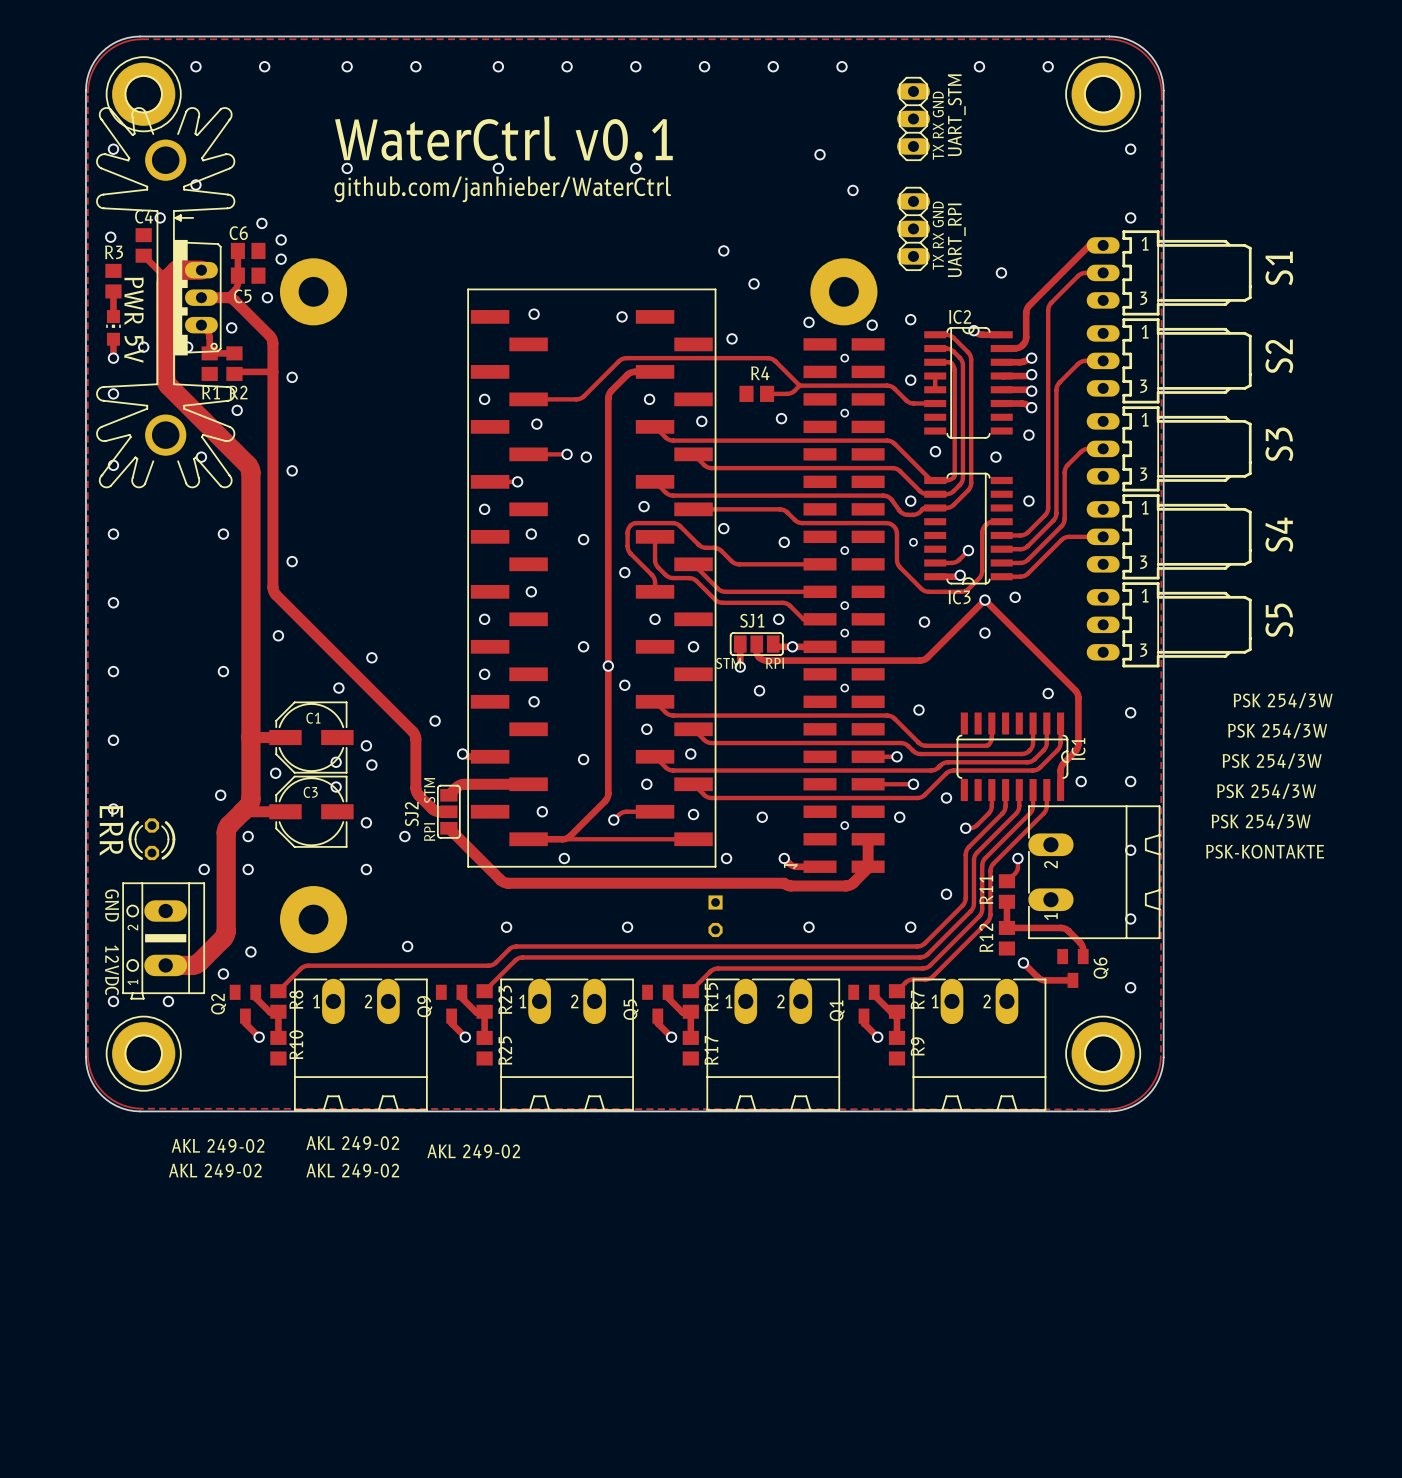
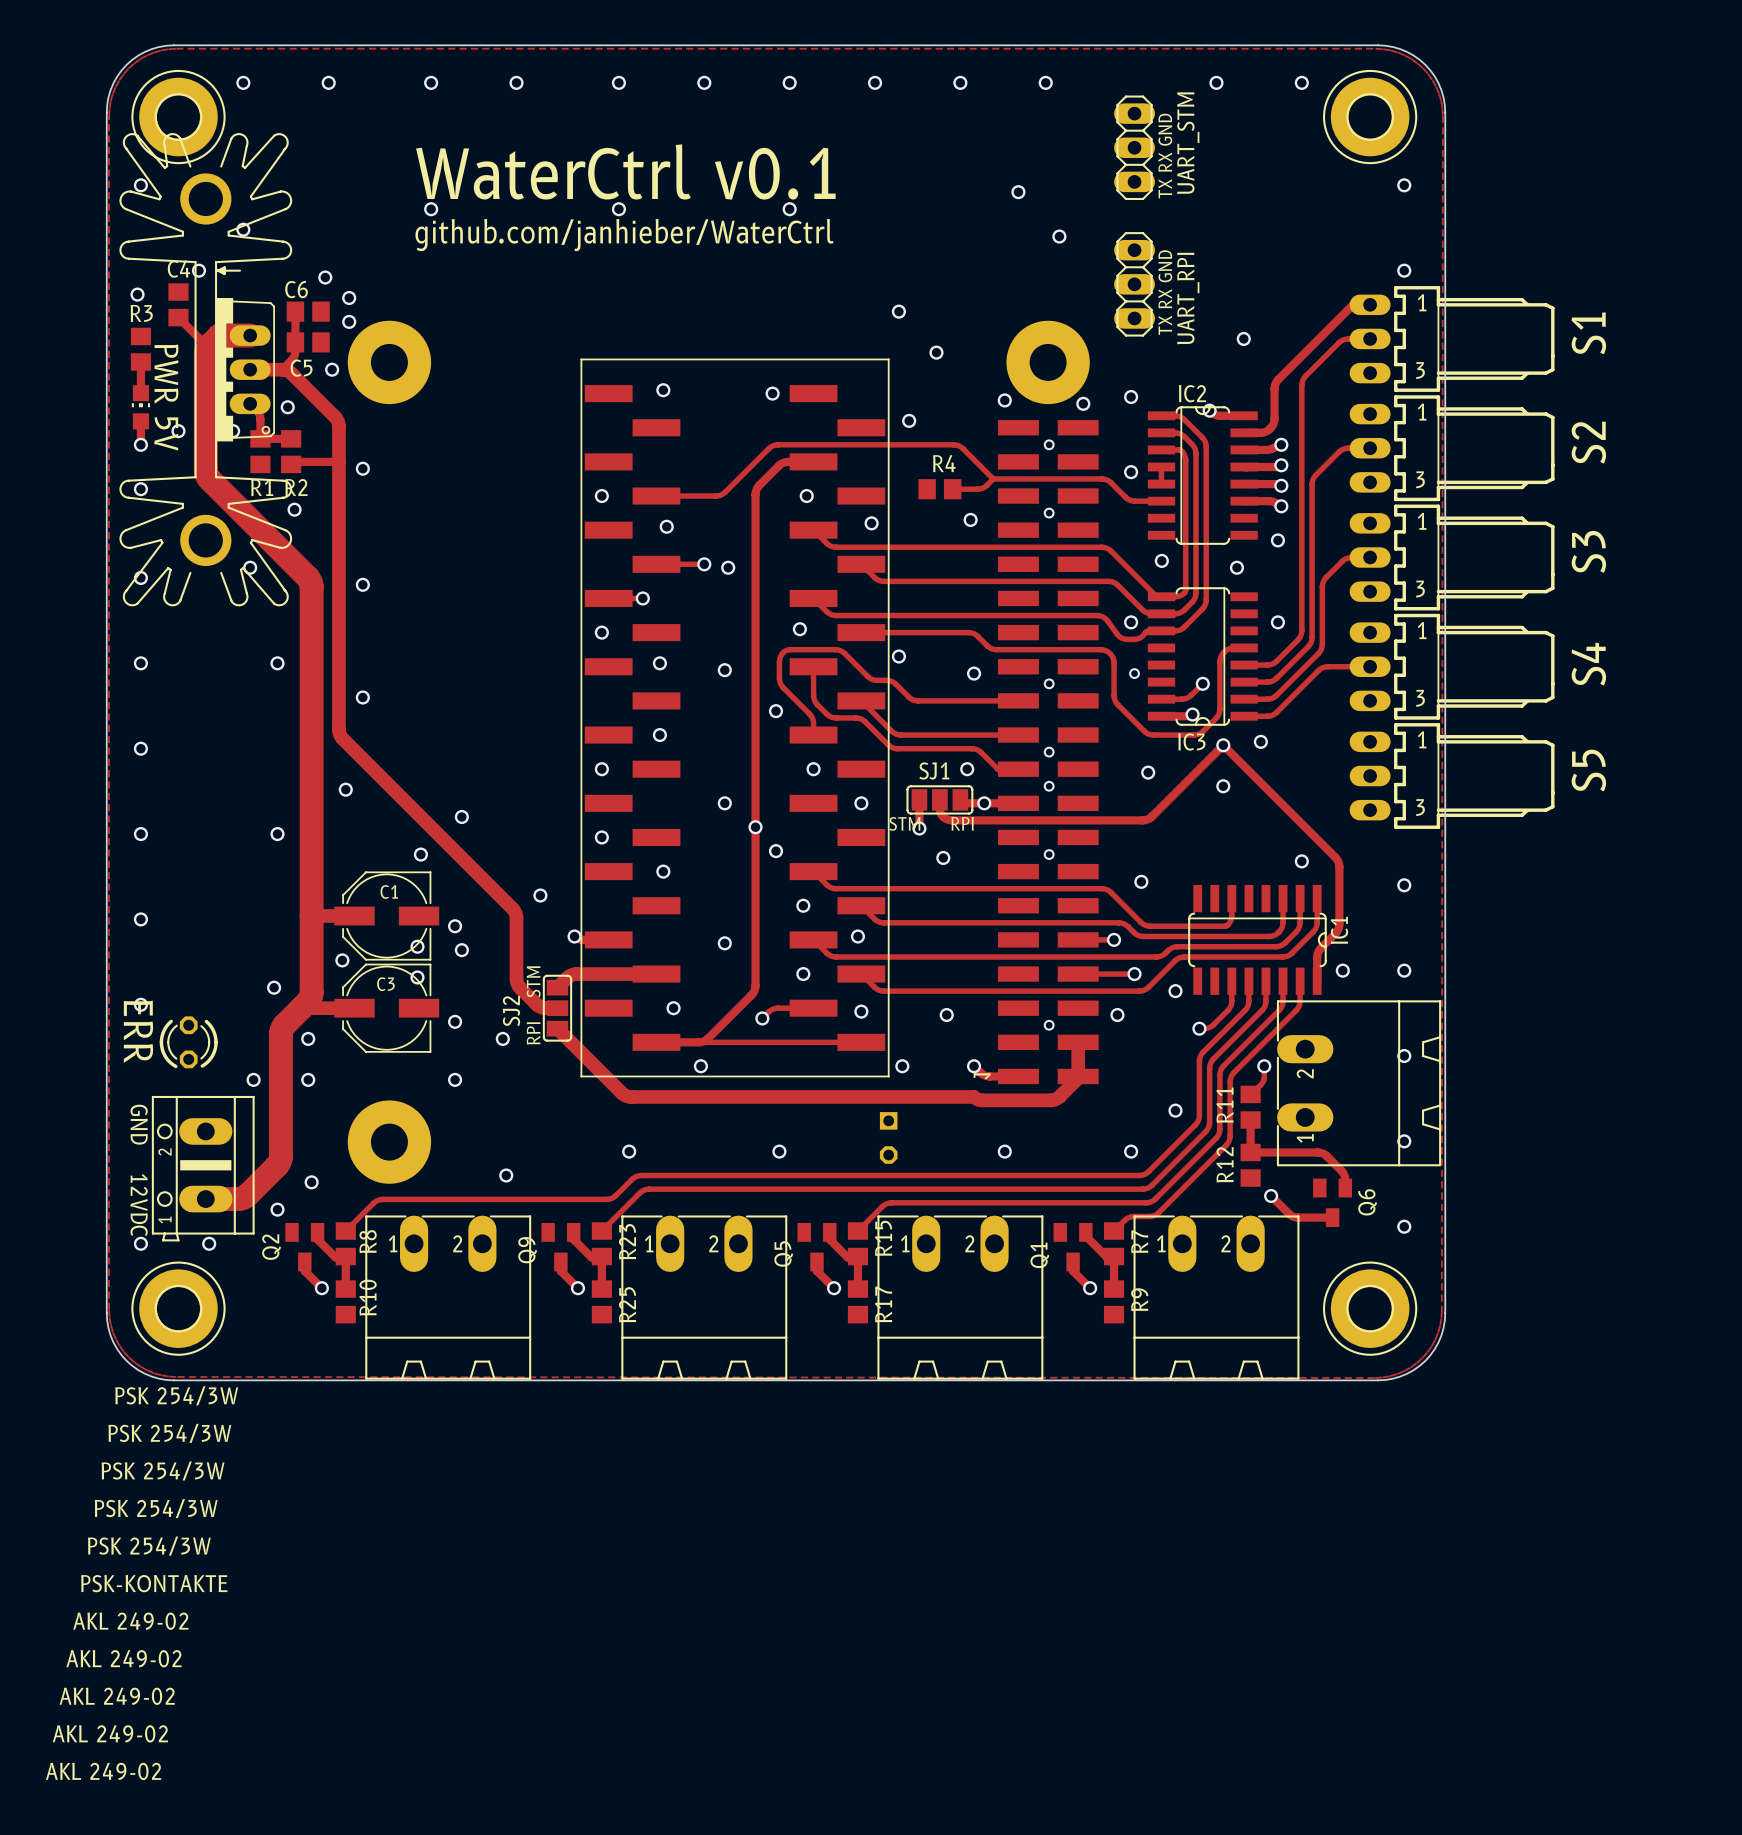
drawing: [1206, 692, 1333, 859] -> none
drawing: none -> [45, 1386, 239, 1781]
drawing: [168, 1136, 521, 1178] -> none

